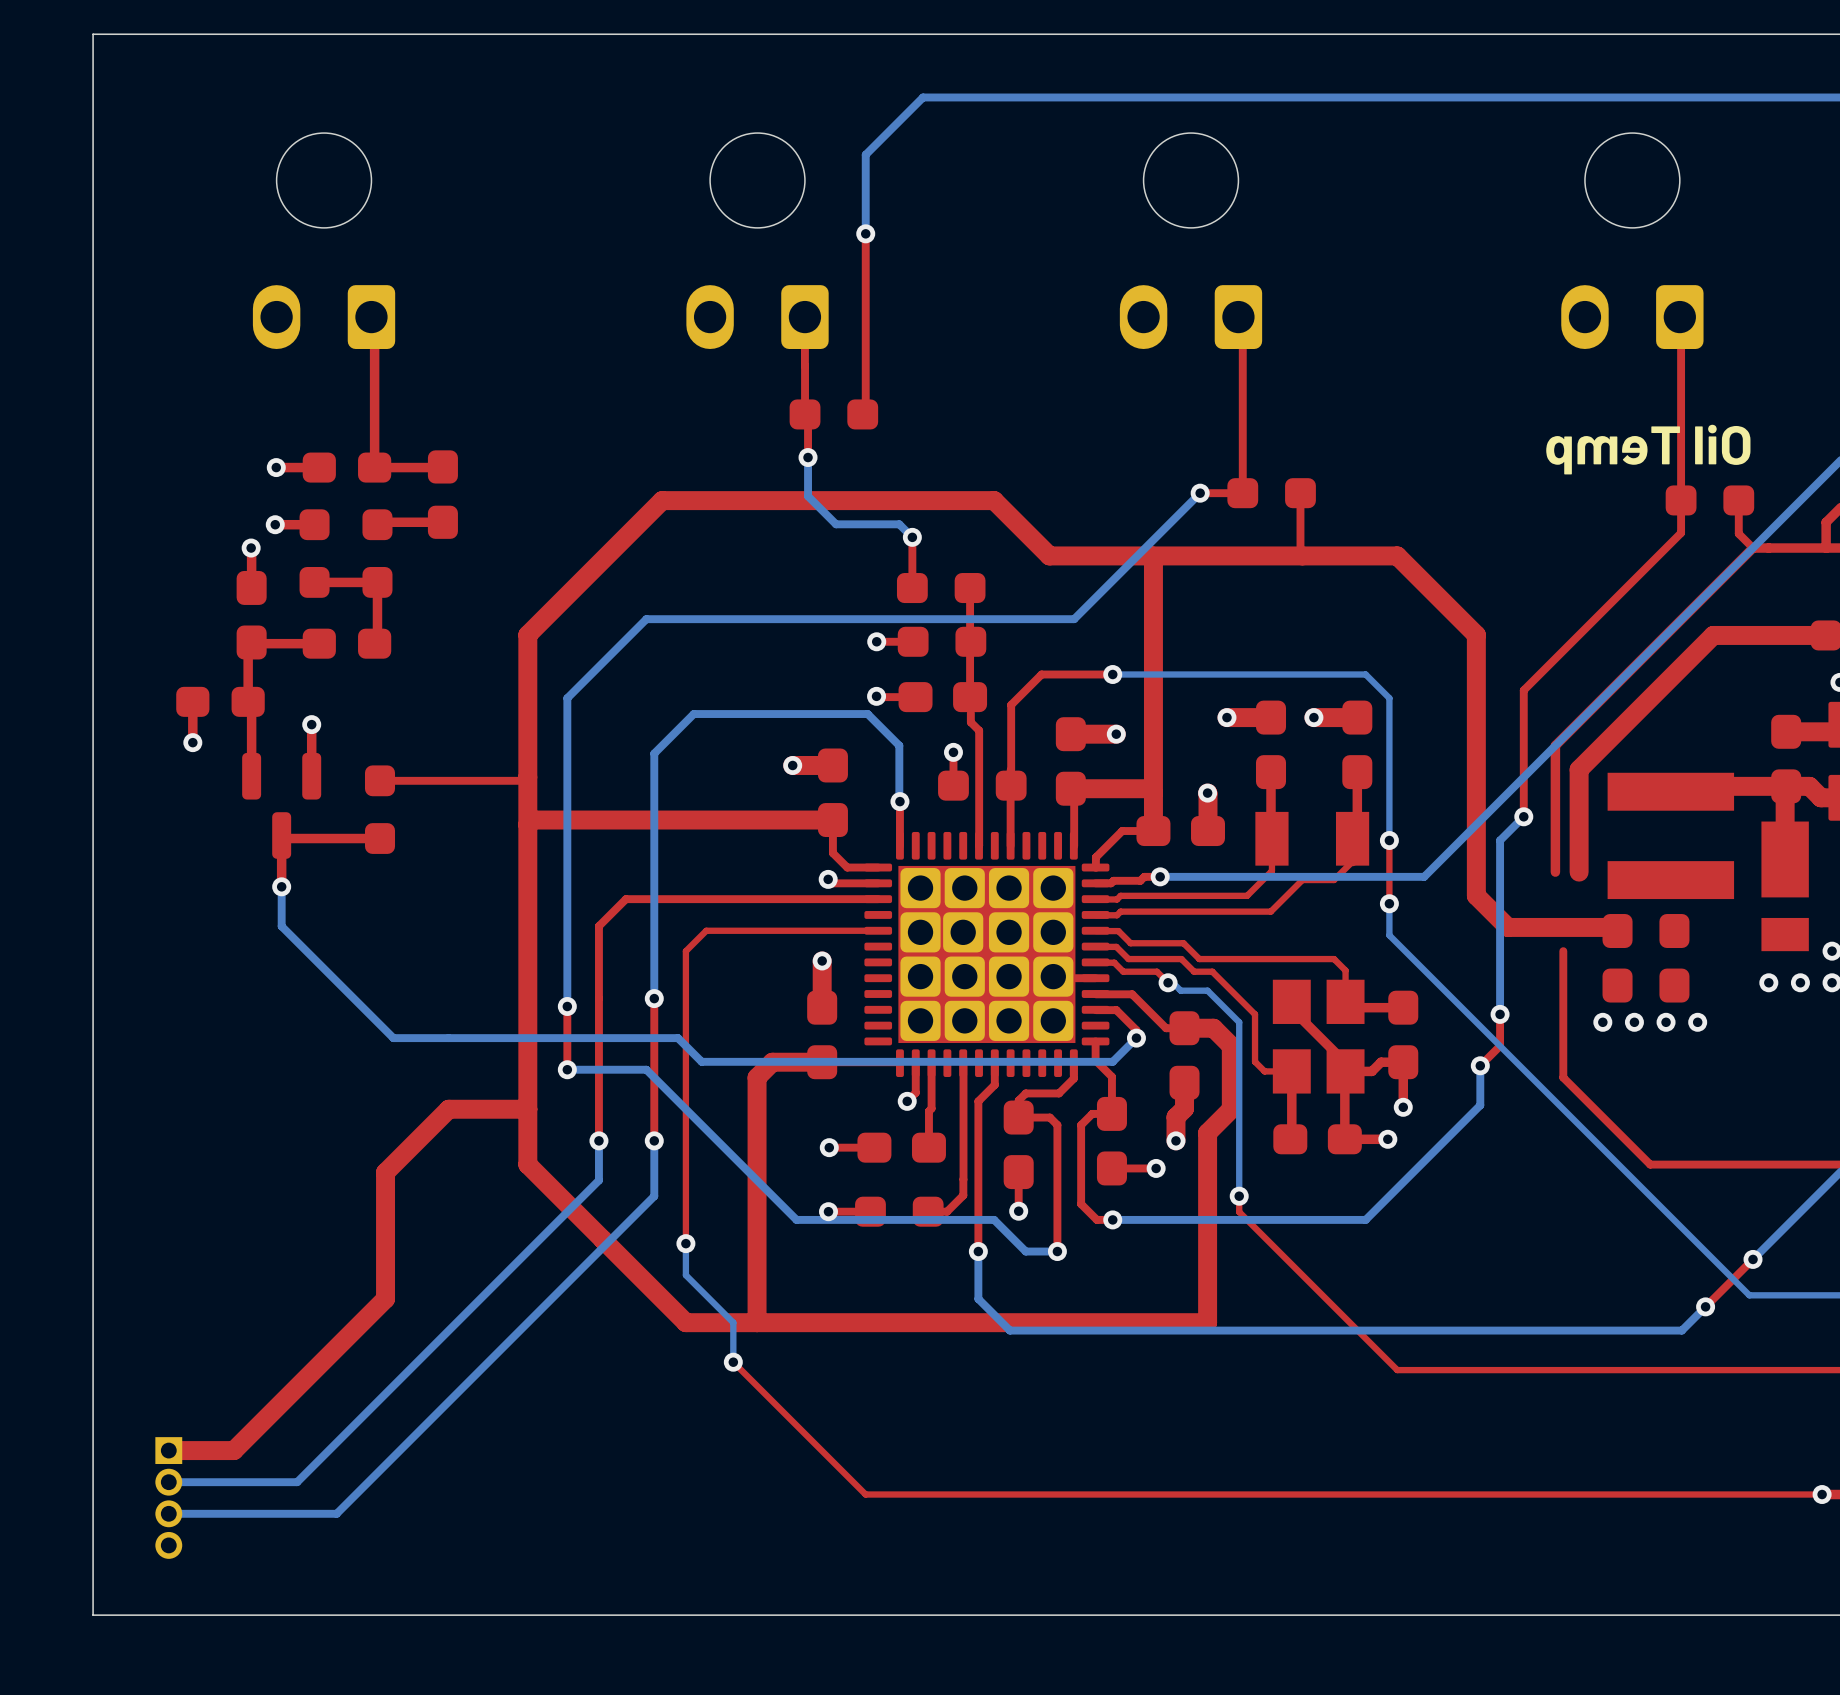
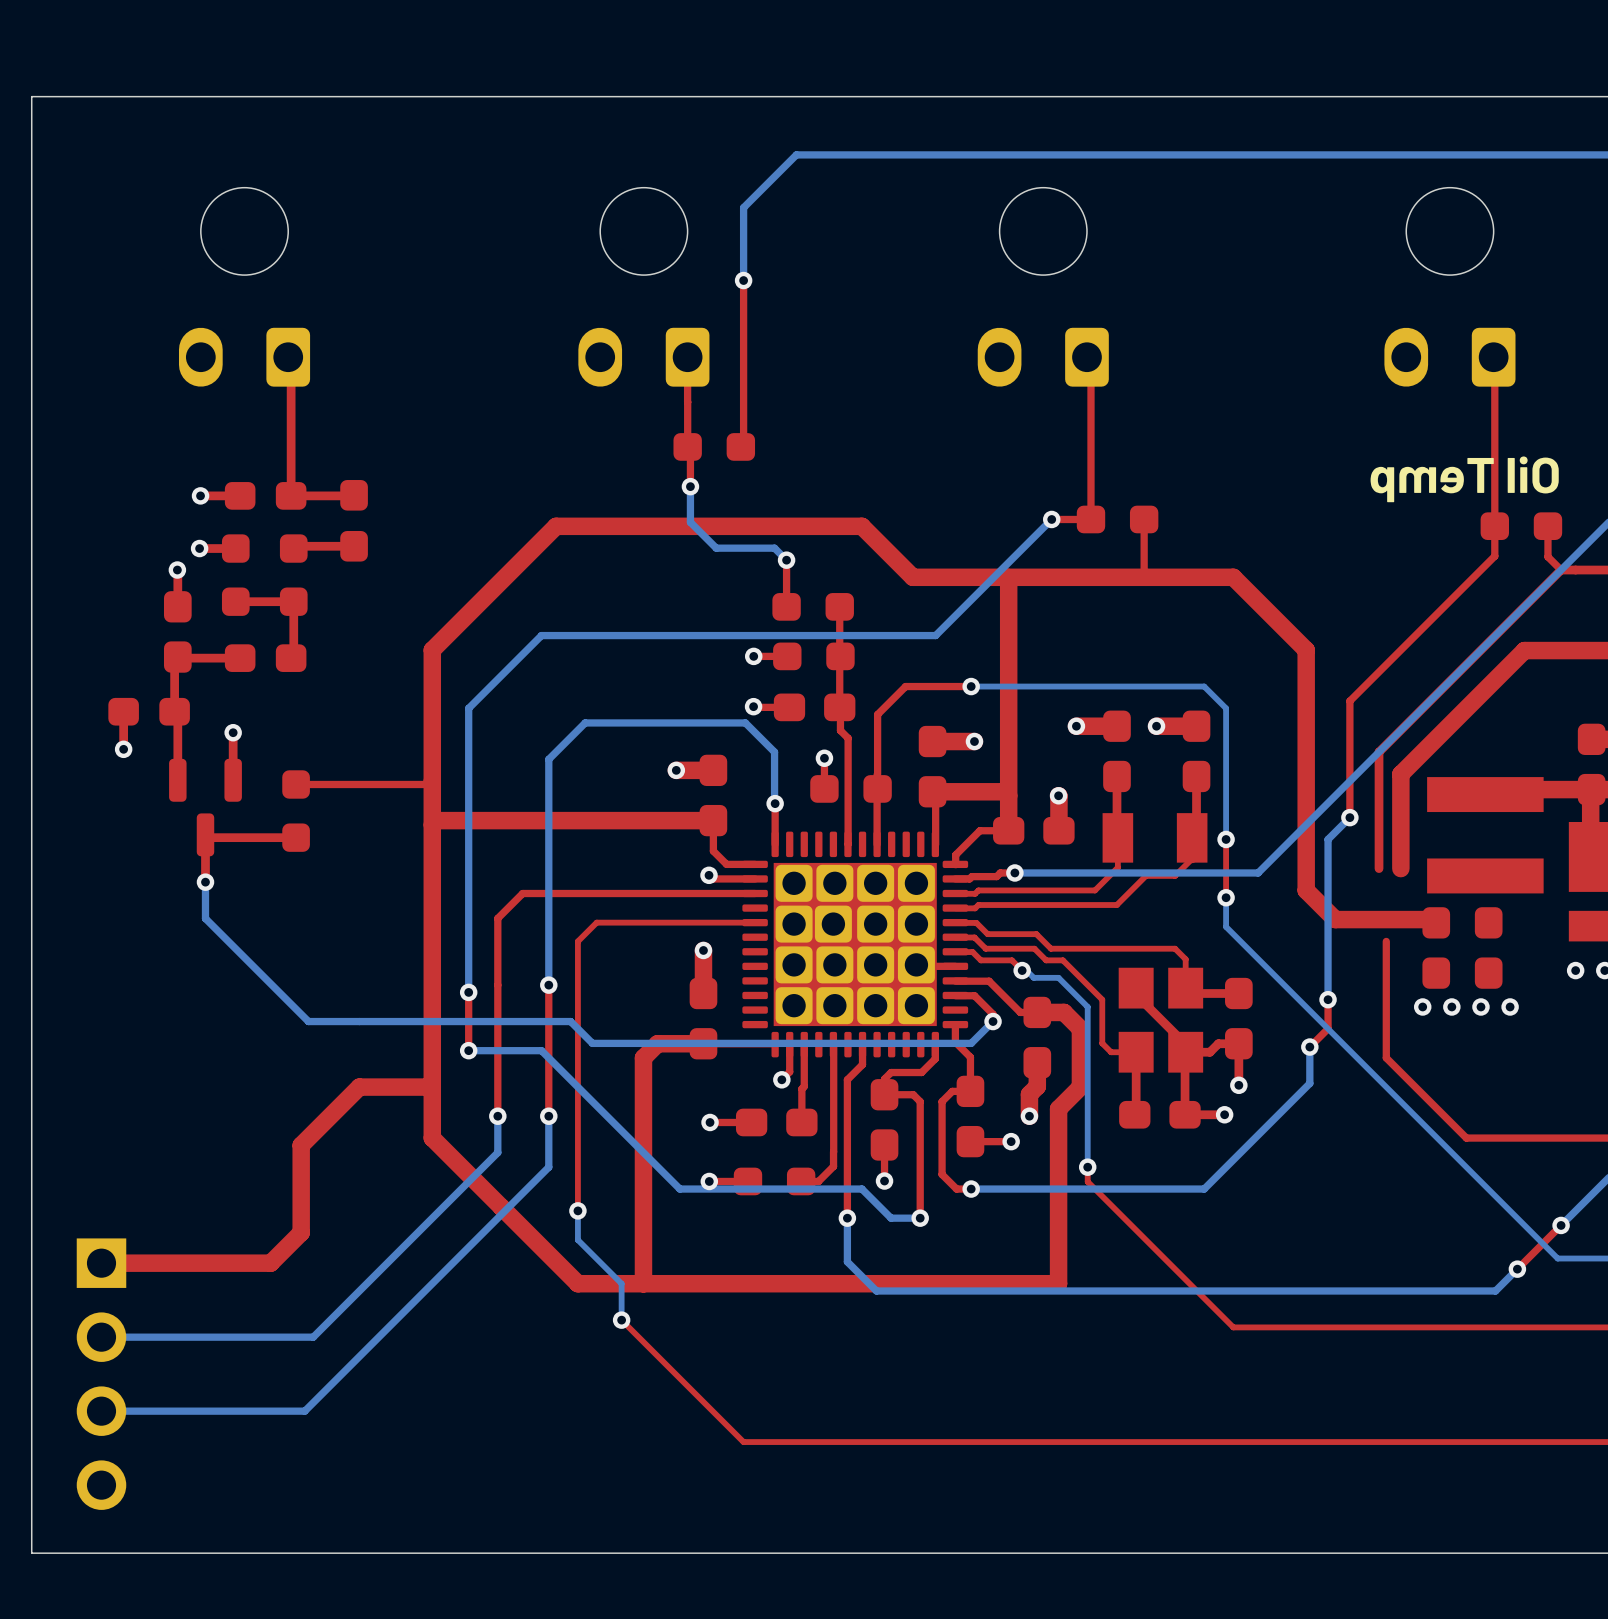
top track: (385, 1267) (385, 1298) (233, 1450) (168, 1450) -> (301, 1232) (270, 1263) (101, 1263)
bottom track: (398, 1380) (297, 1482) (168, 1482) -> (313, 1337) (101, 1337)
part: none -> (101, 1374)
bottom track: (389, 1461) (336, 1513) (168, 1513) -> (304, 1411) (101, 1411)
part: (168, 1497) -> none

